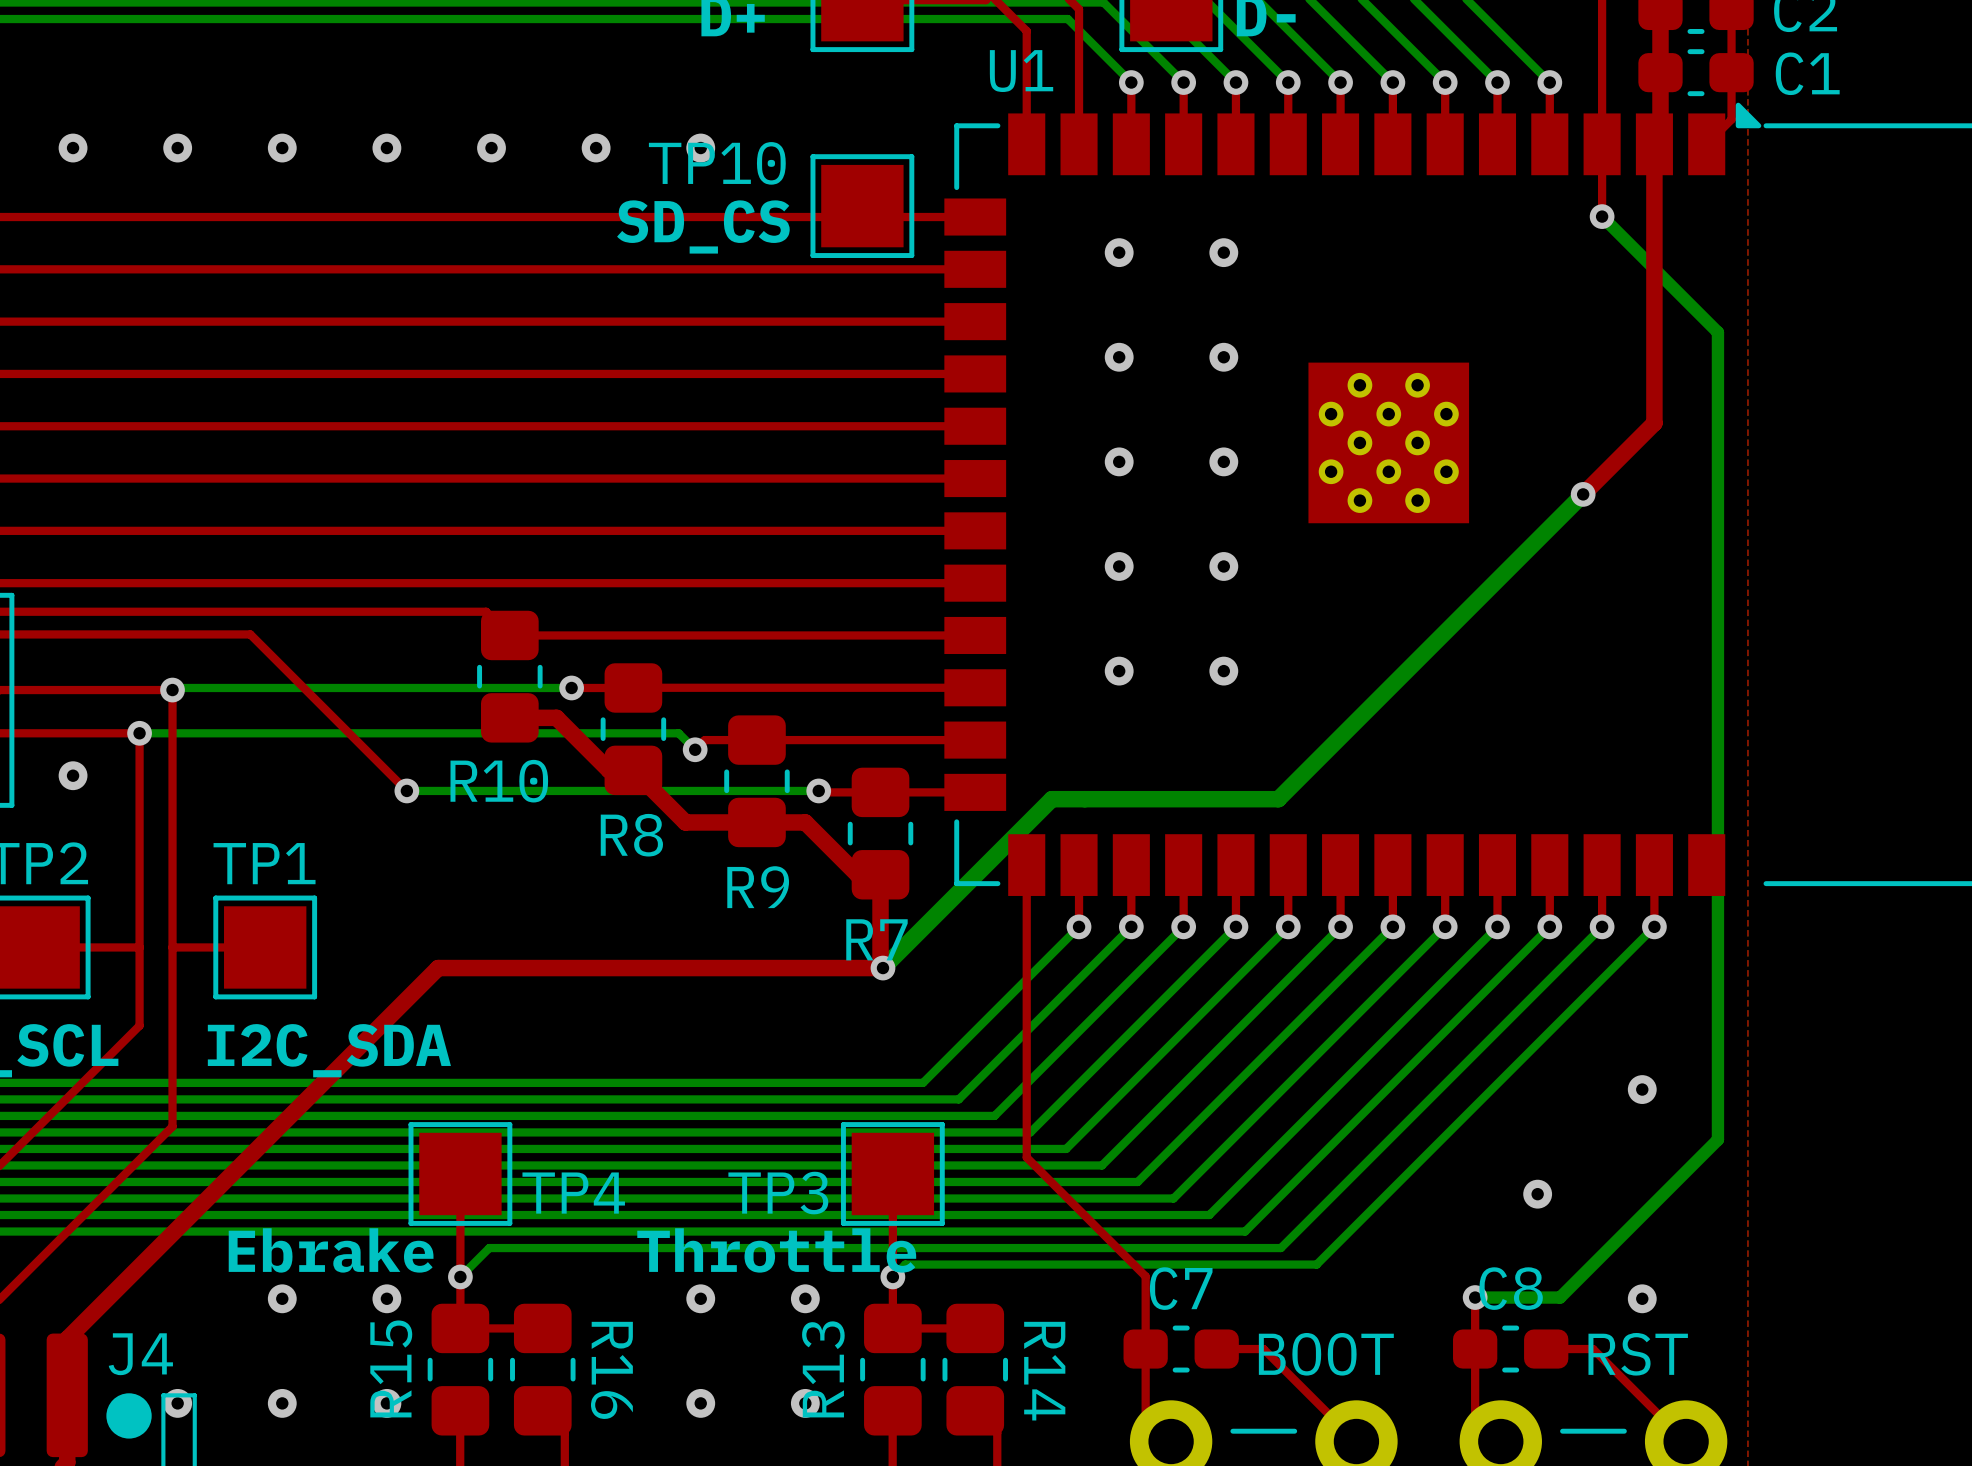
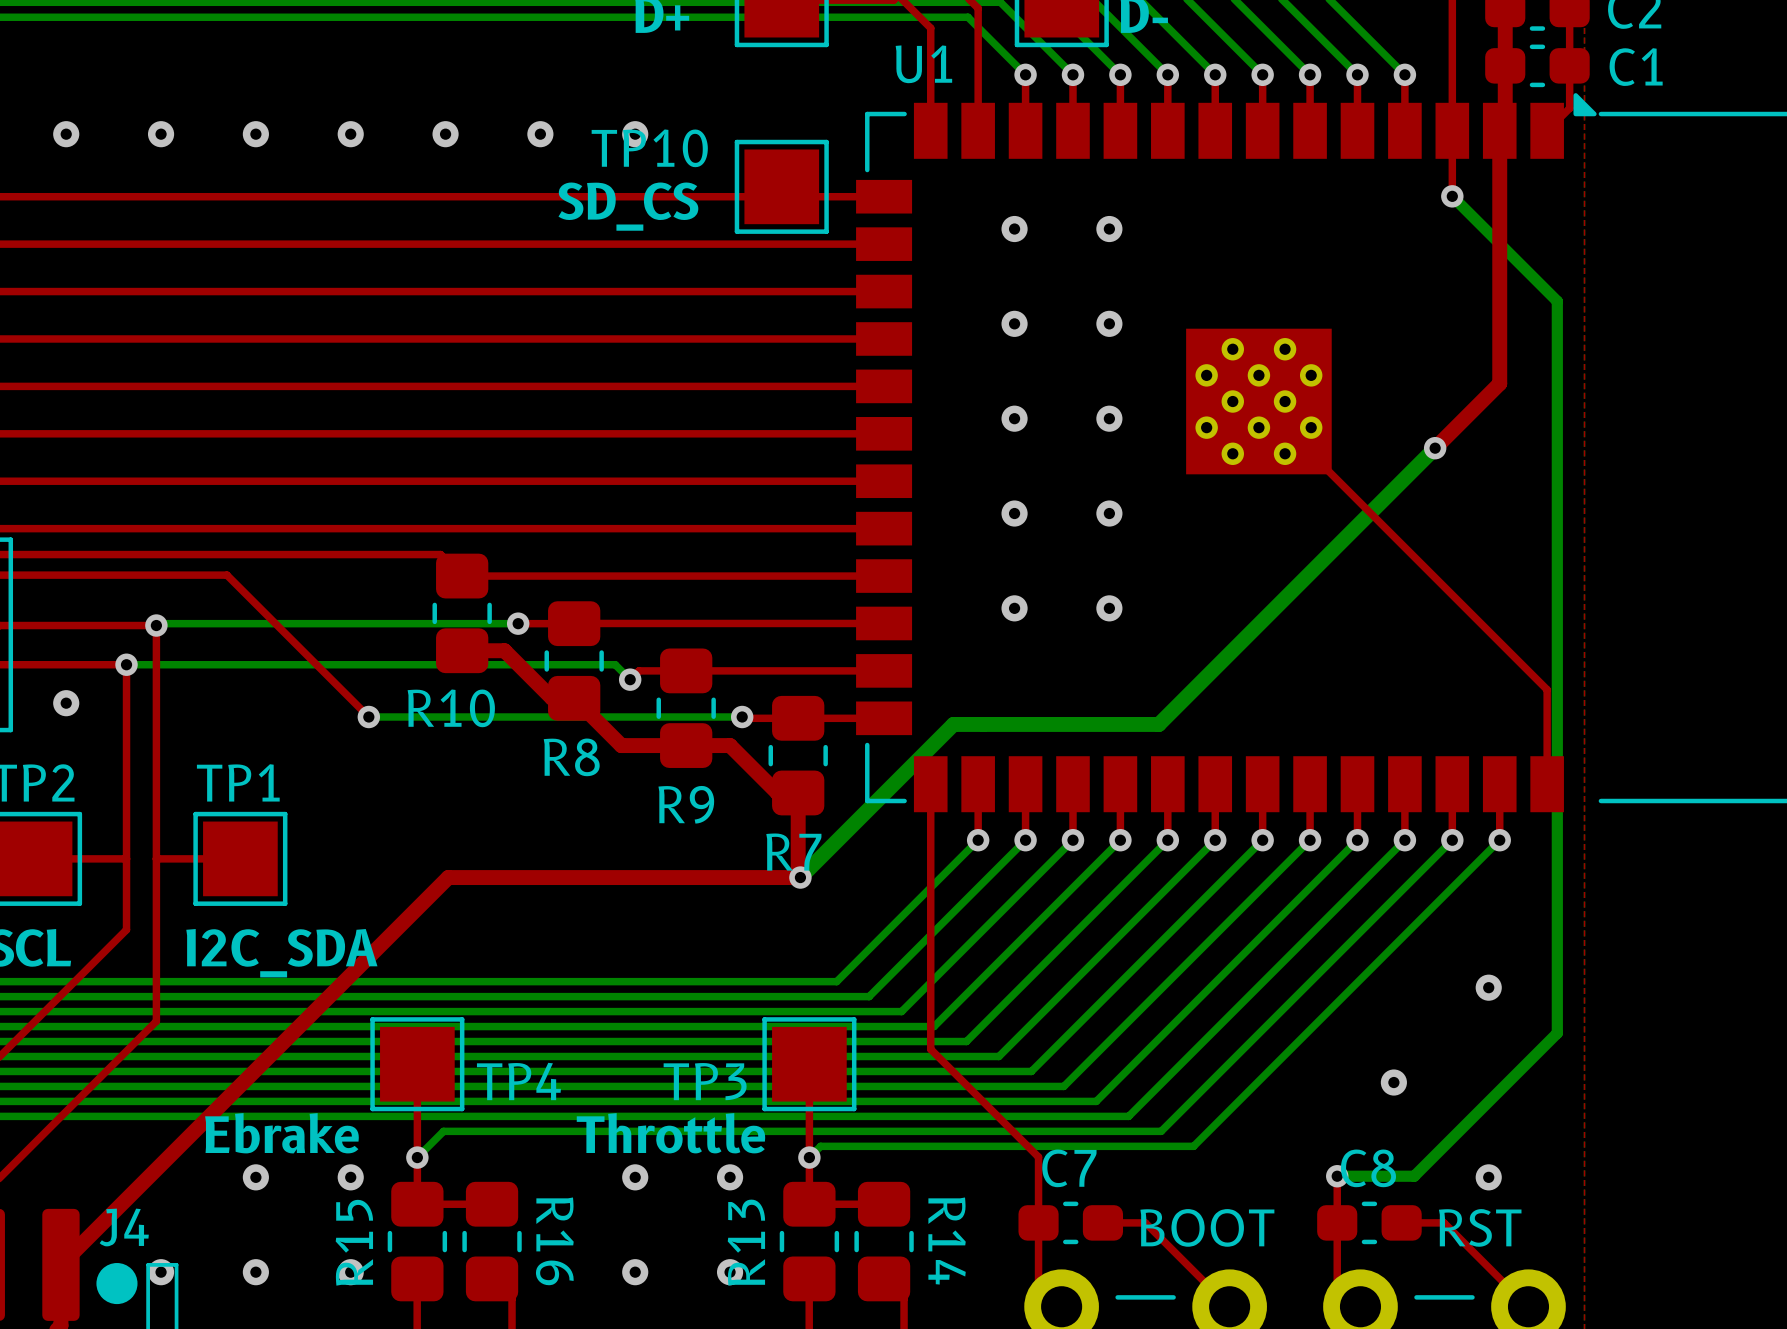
top track: none -> (1258, 401) (1547, 689) (1547, 784)
top track: (494, 968) (438, 968) (67, 1338) (67, 1395) -> (448, 877) (60, 1264)

